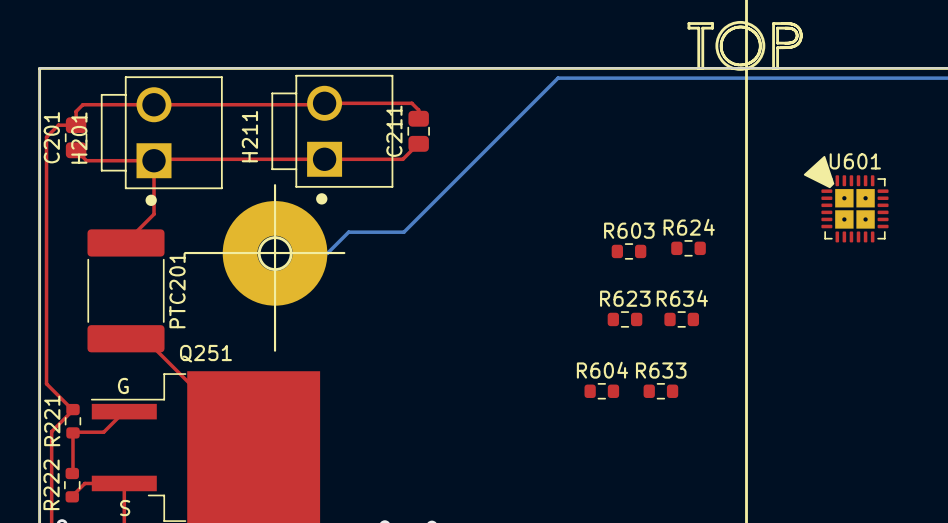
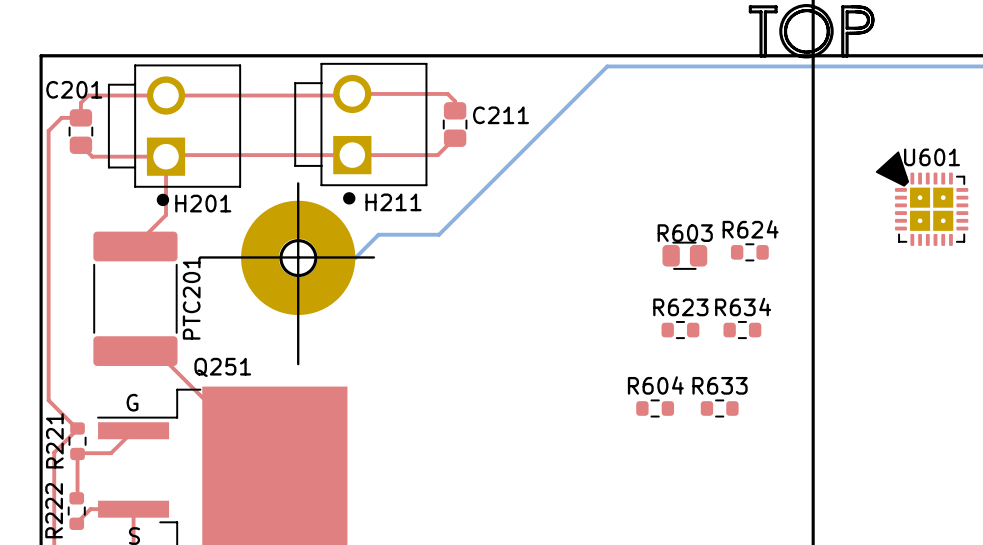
C211 name rotation: 0° (394, 131) -> 90° clockwise (500, 115)
C211 name position: C211 (394, 131) -> C211 (500, 115)
H211 name rotation: 0° (249, 136) -> 90° clockwise (393, 202)
H211 name position: H211 (249, 136) -> H211 (393, 202)
C201 name rotation: 0° (51, 137) -> 90° clockwise (74, 89)
H201 name rotation: 0° (79, 138) -> 90° clockwise (203, 203)
H201 name position: H201 (79, 138) -> H201 (203, 203)
R603 footprint: [611, 243, 647, 260] -> [662, 241, 708, 270]

